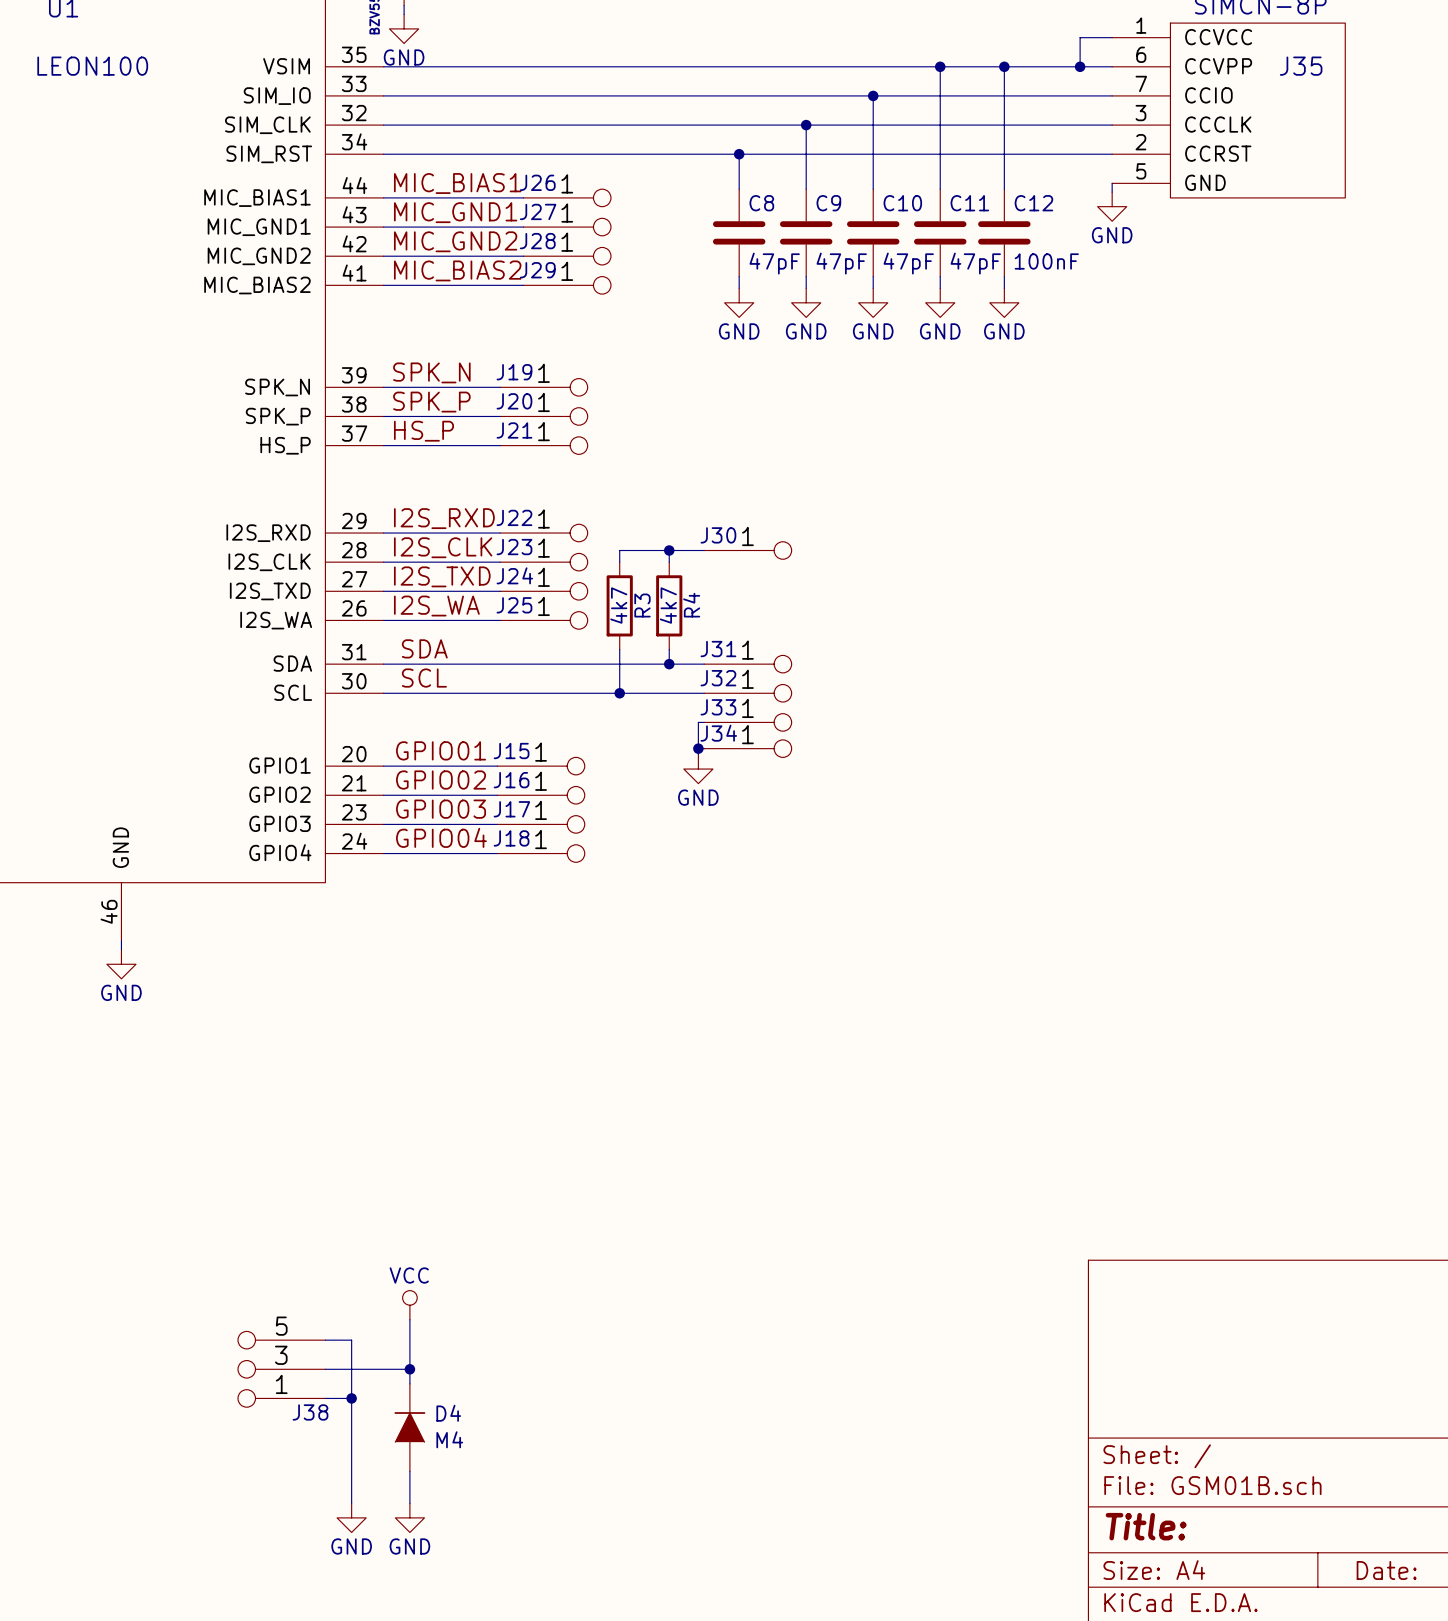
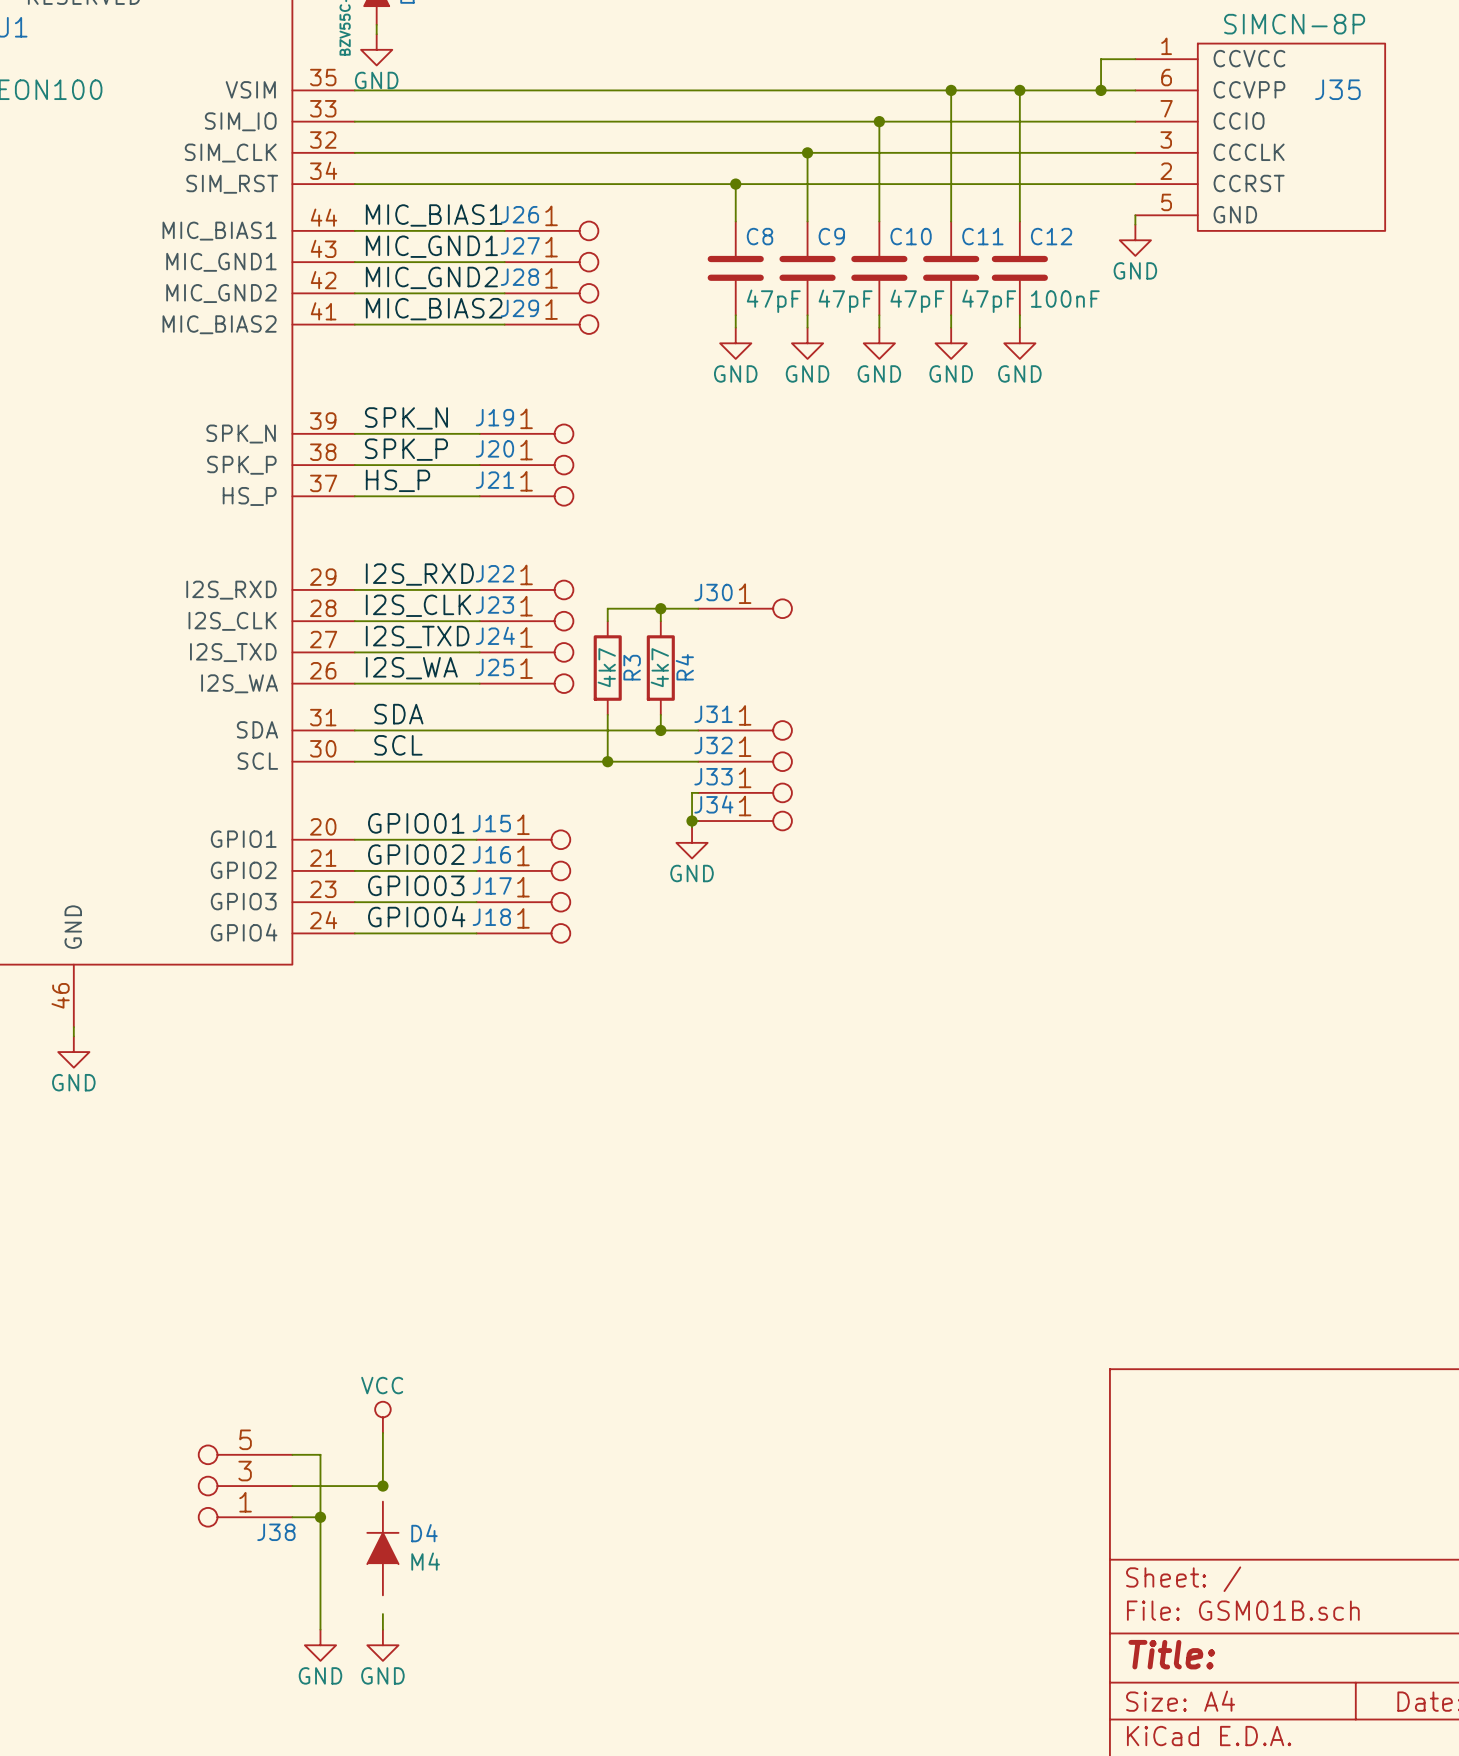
wire: (409, 1372) (409, 1383) -> none
wire: (409, 1471) (409, 1488) -> none

